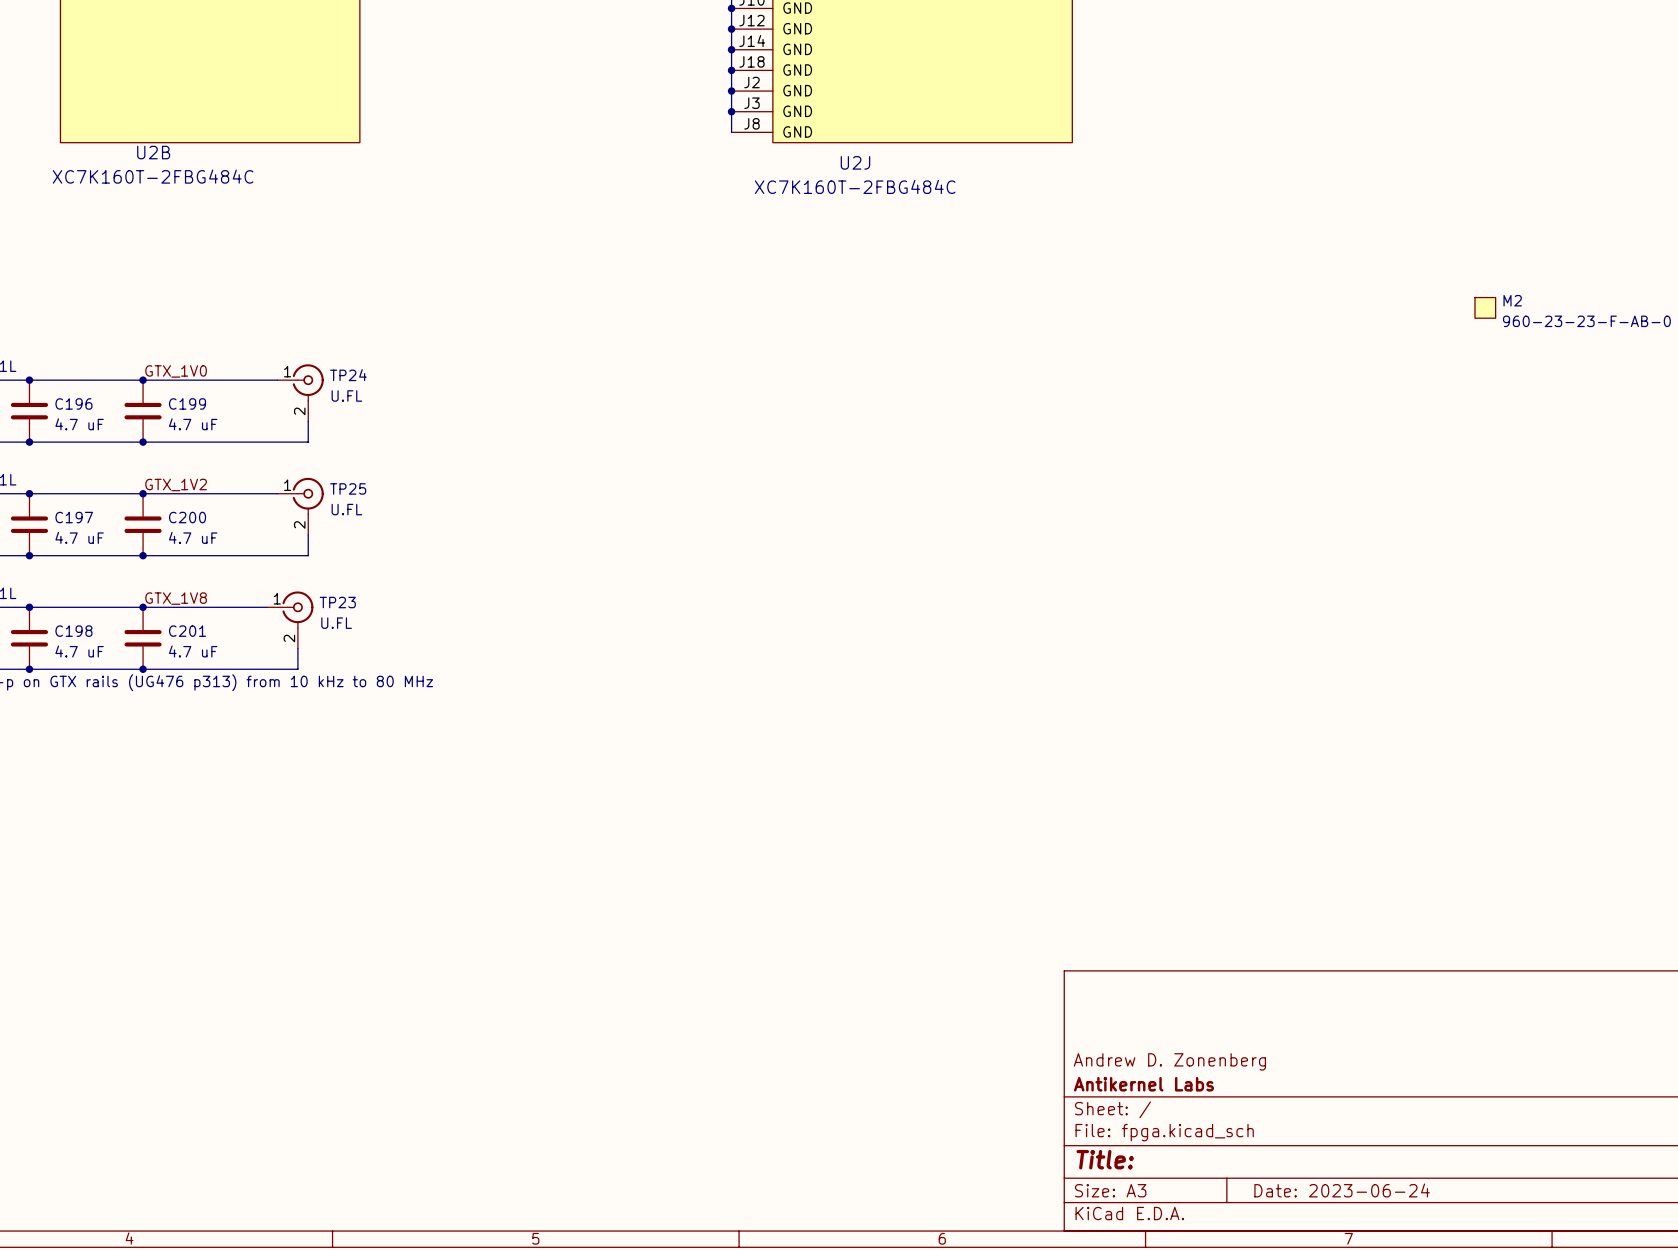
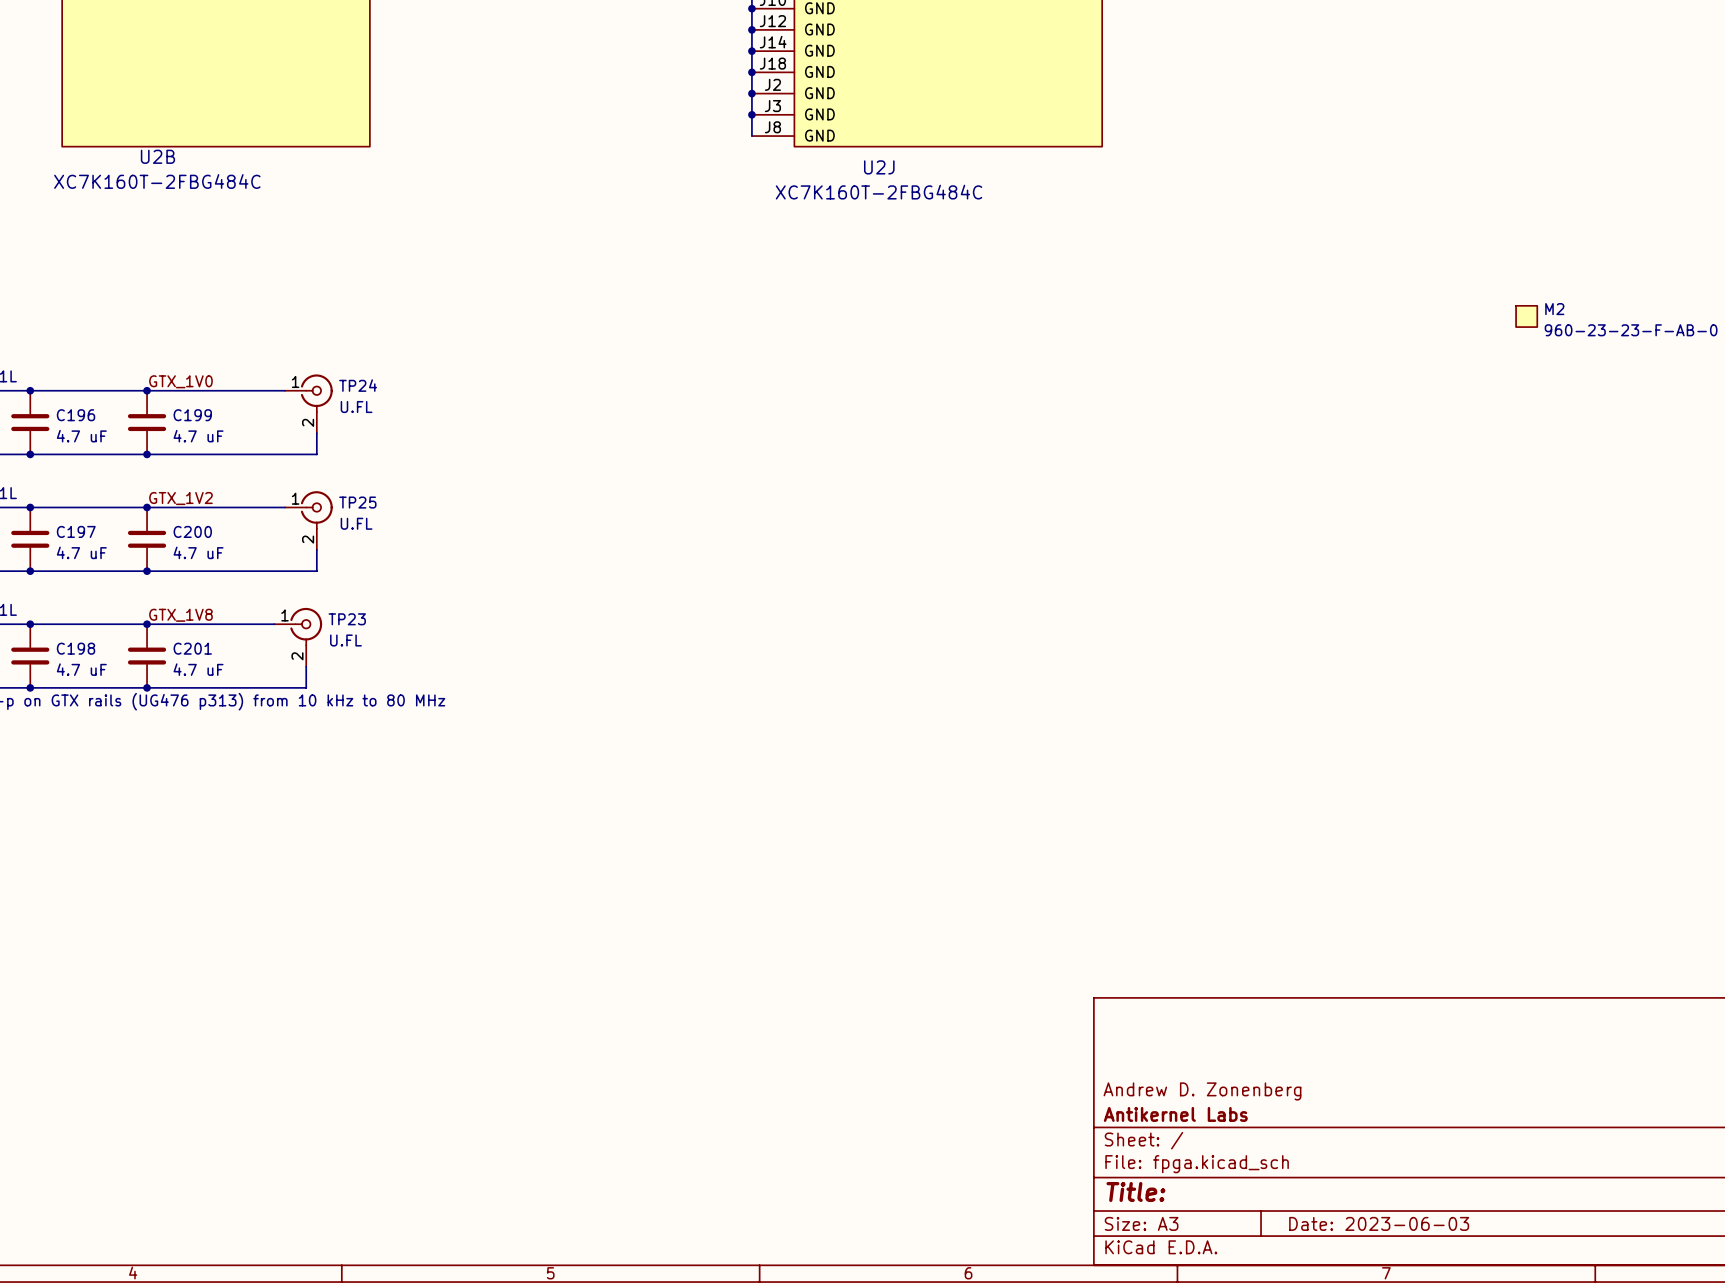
title block: Date: 2023-06-24 (1342, 1190) -> Date: 2023-06-03 (1379, 1223)

